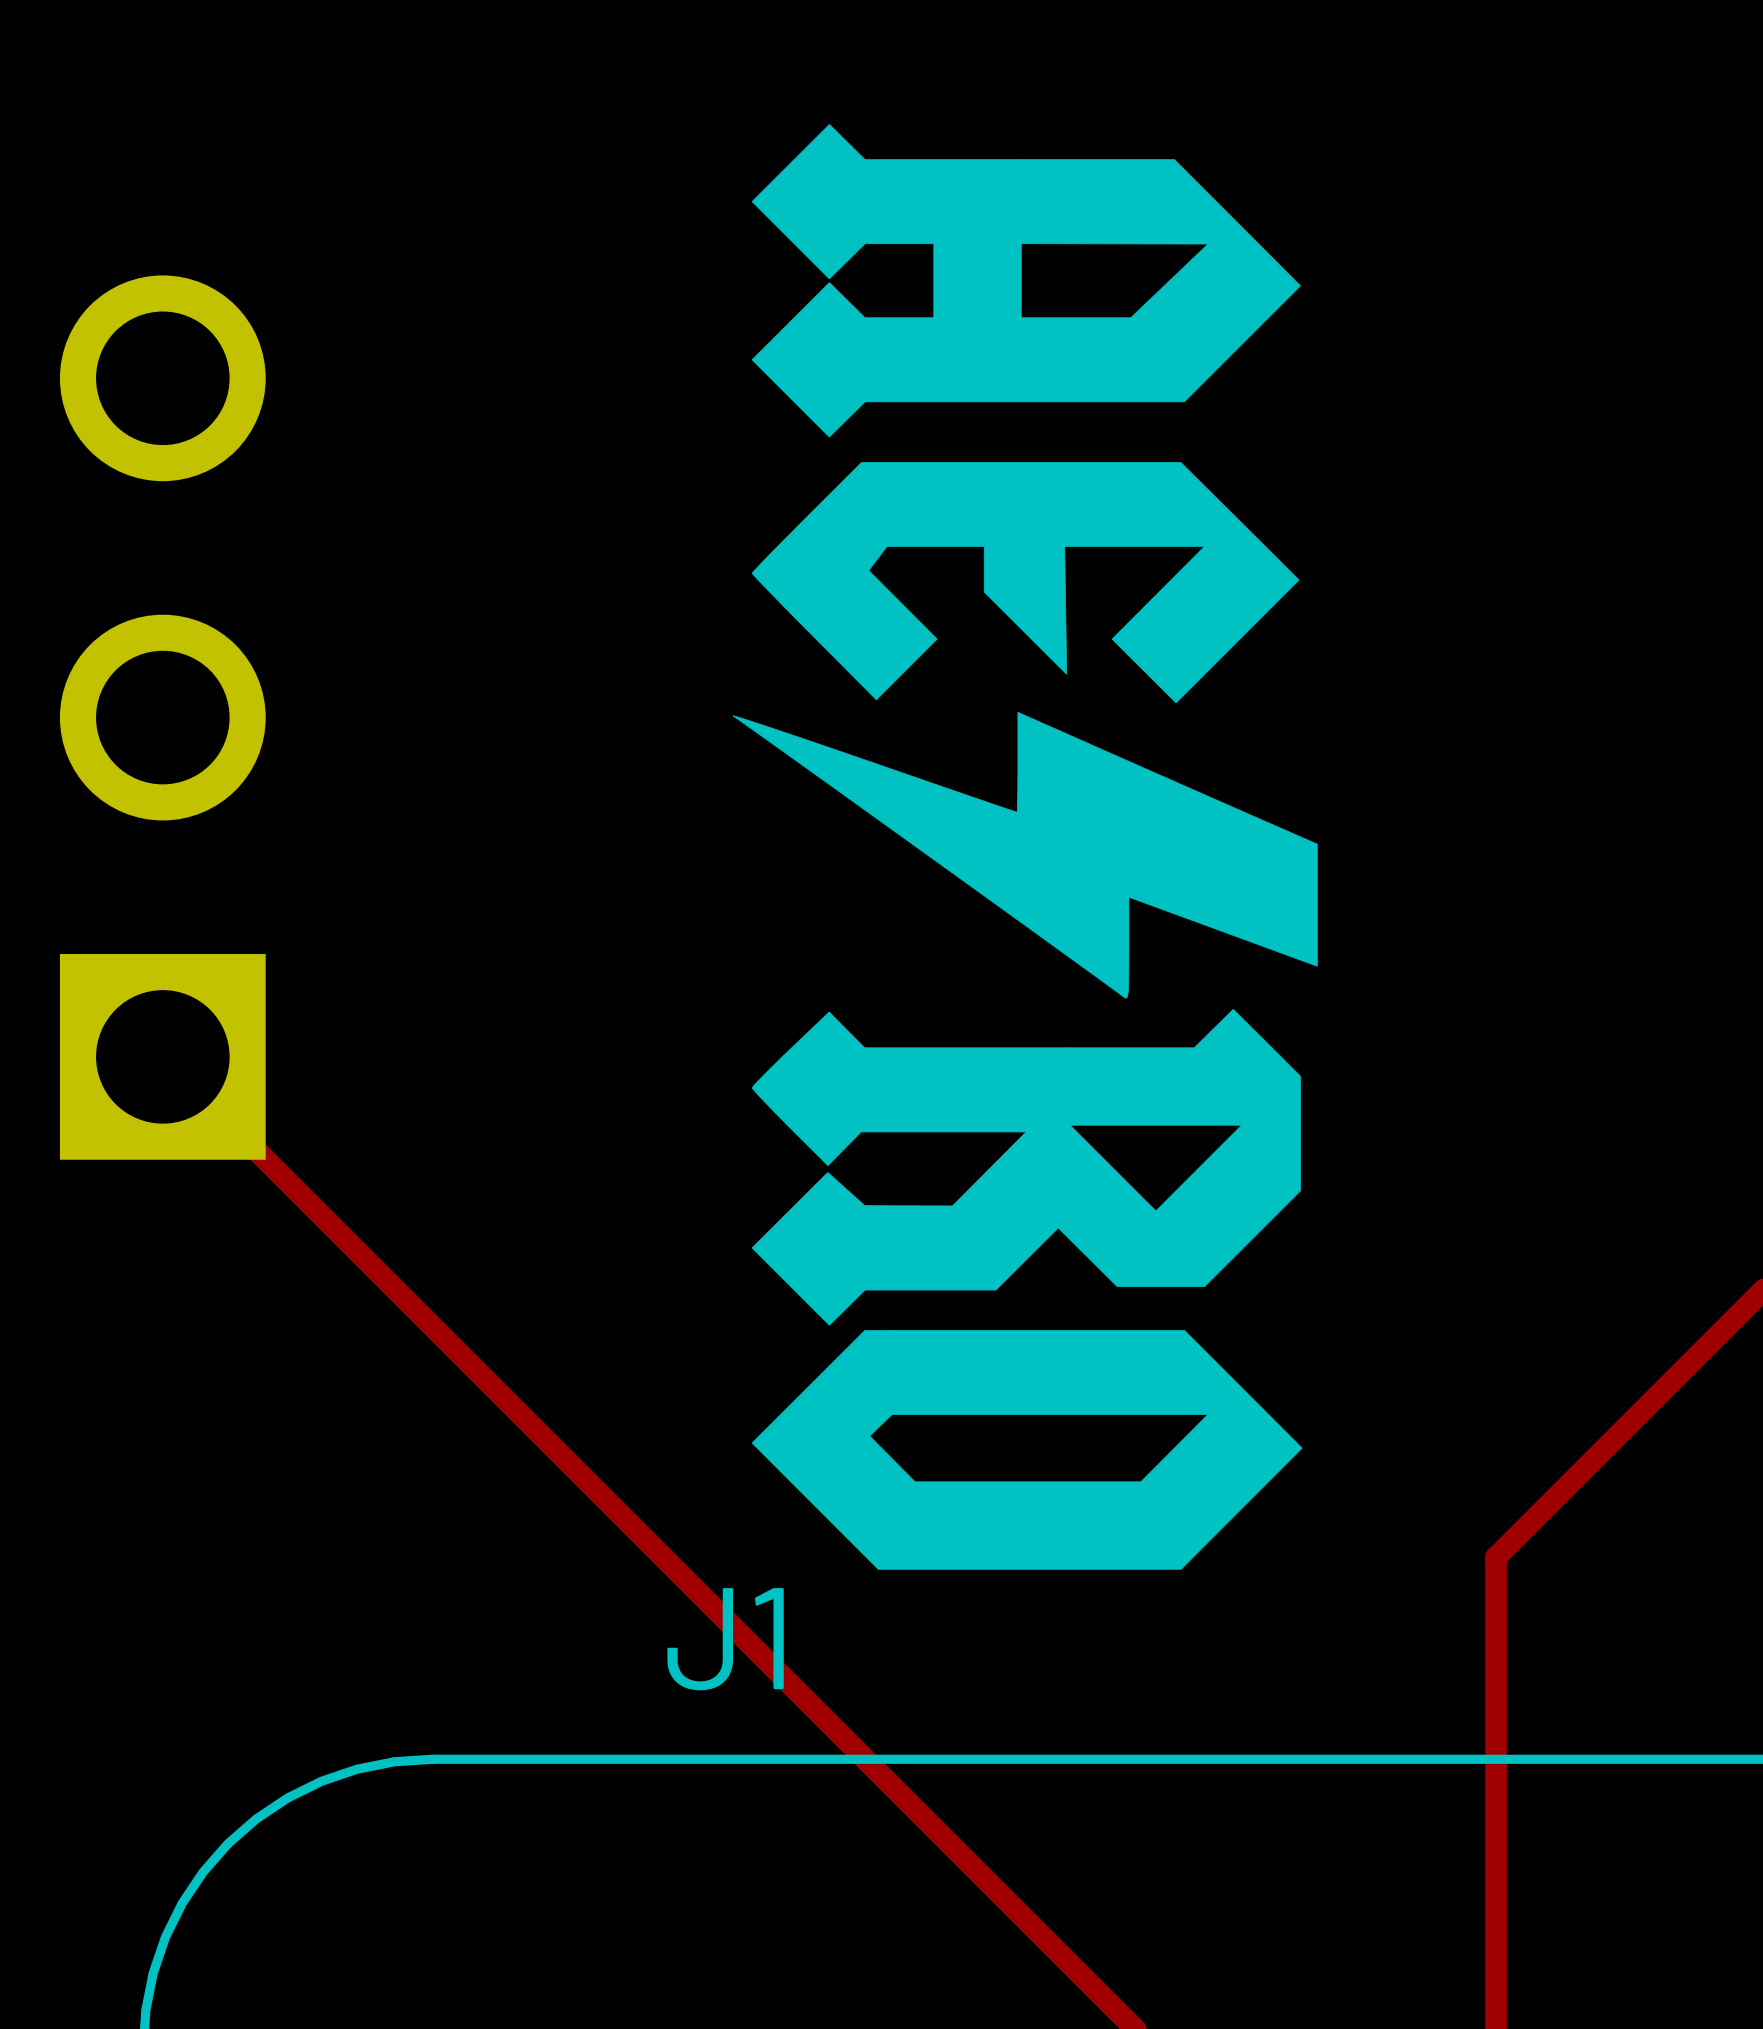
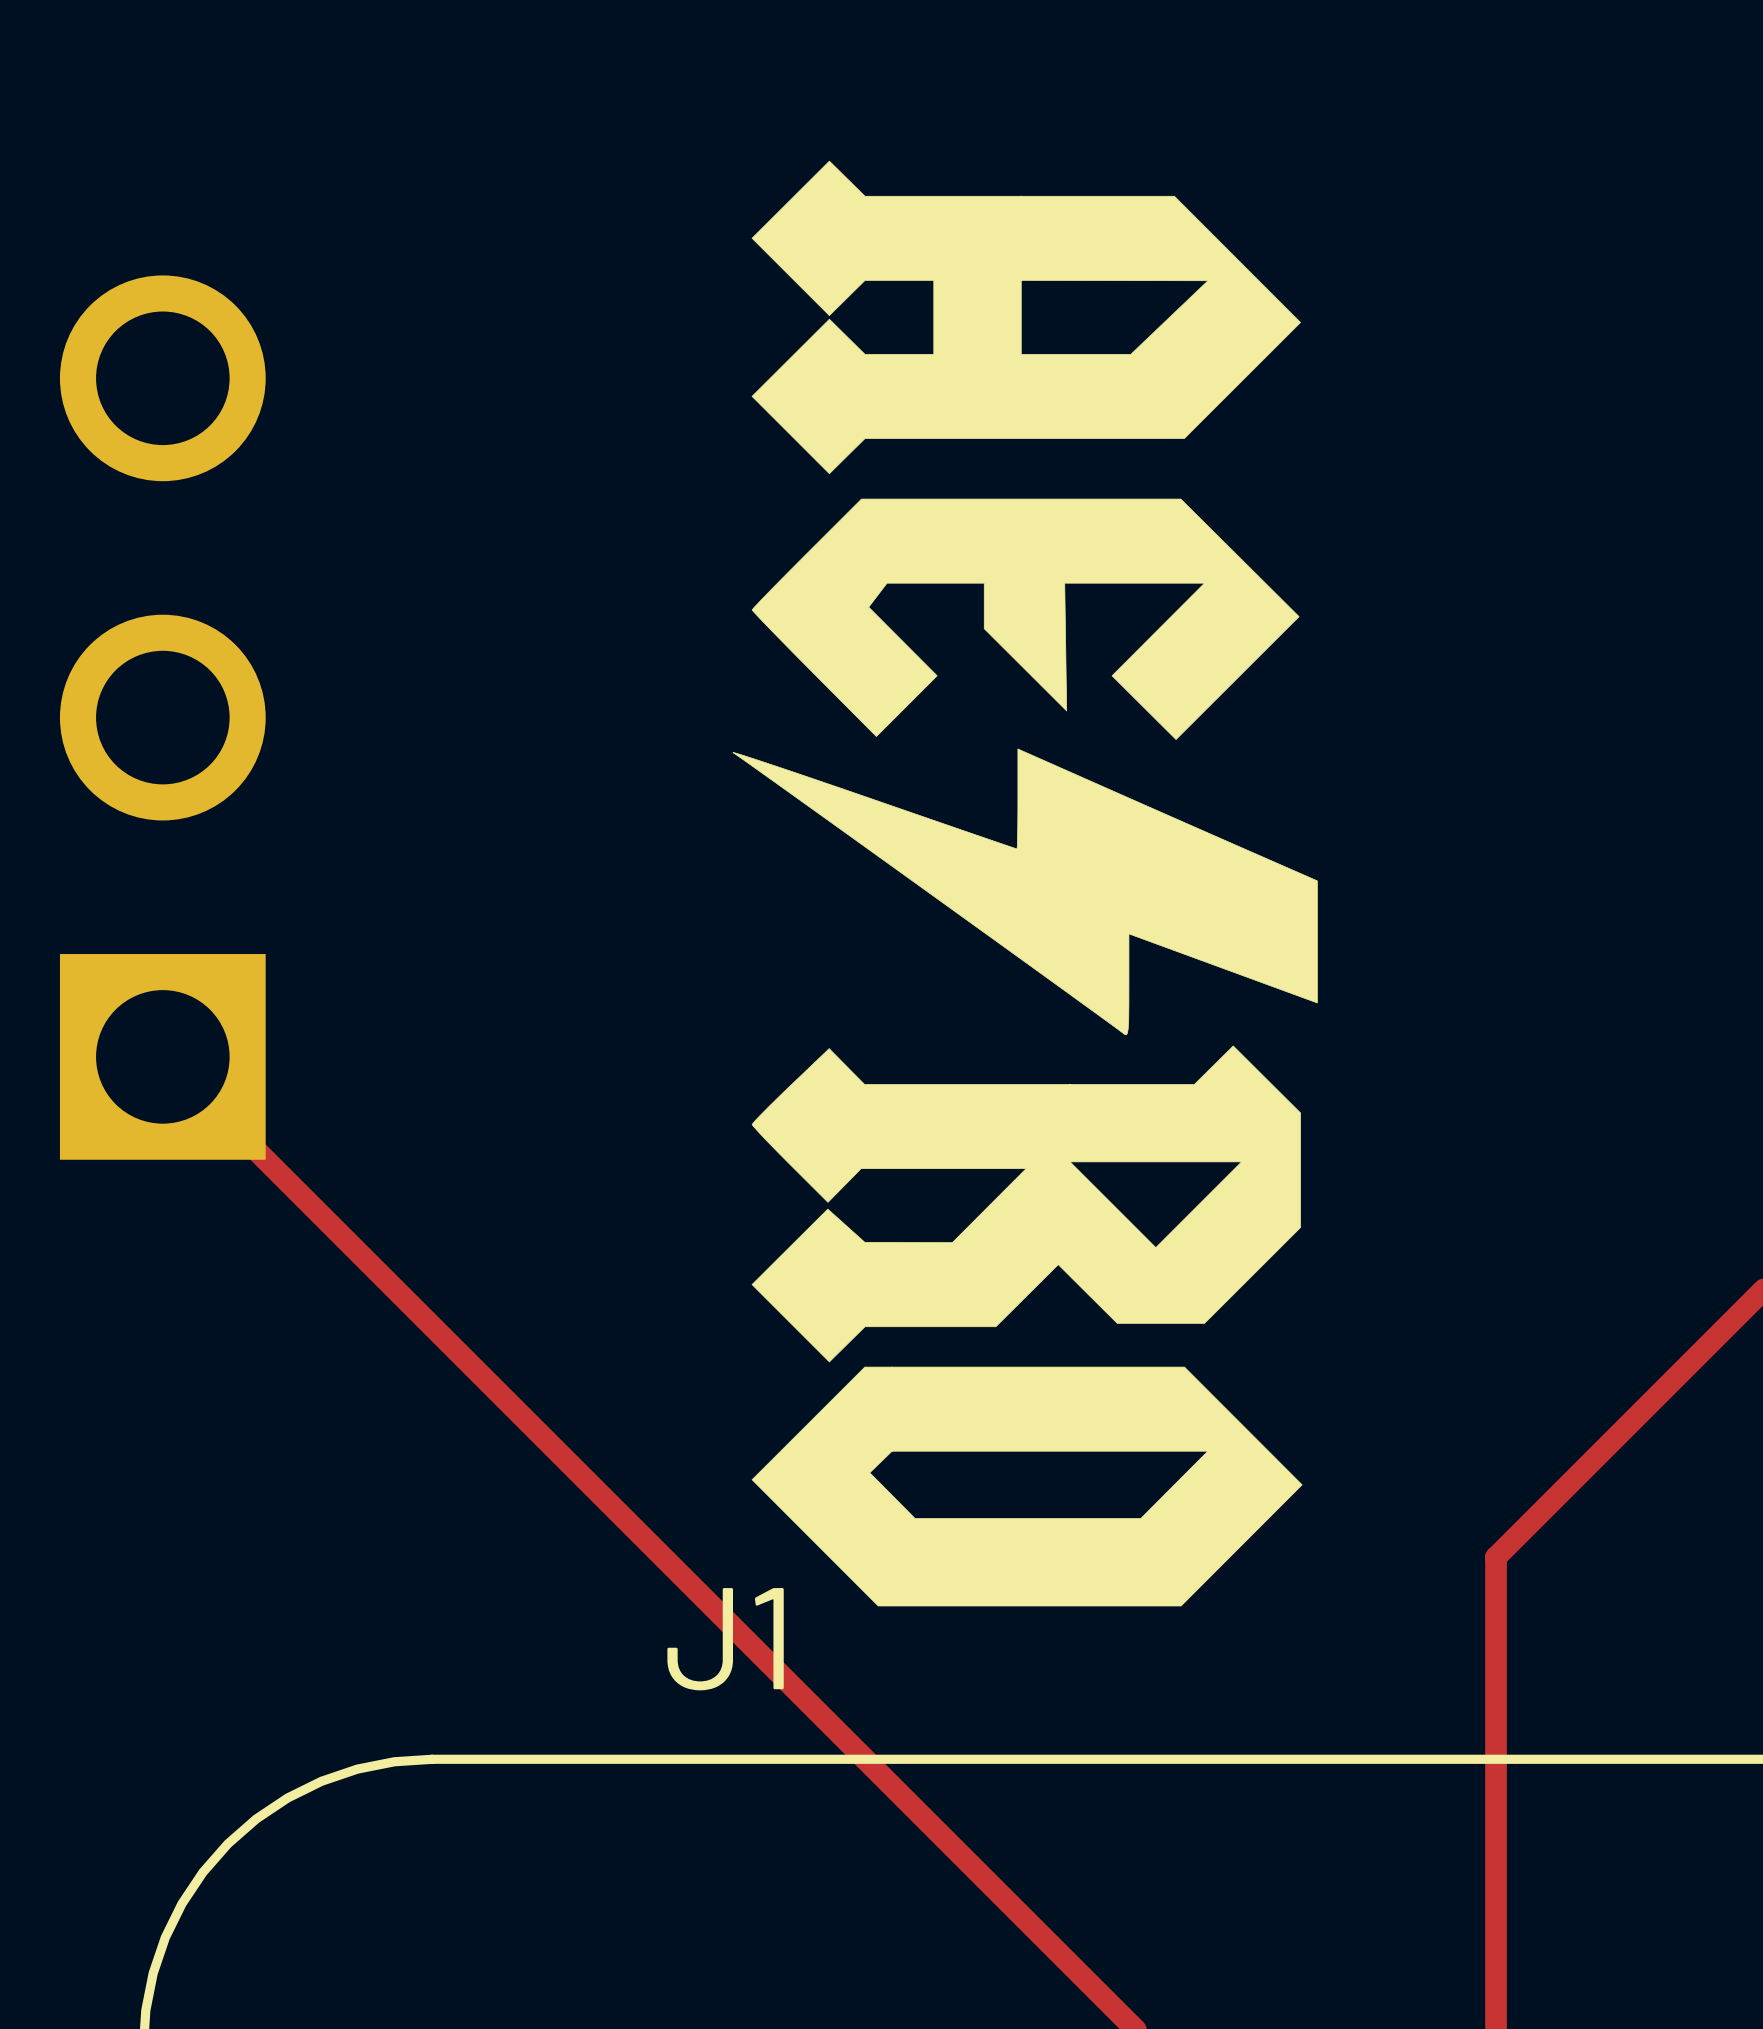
drawing position: (1025, 846) -> (1025, 883)

